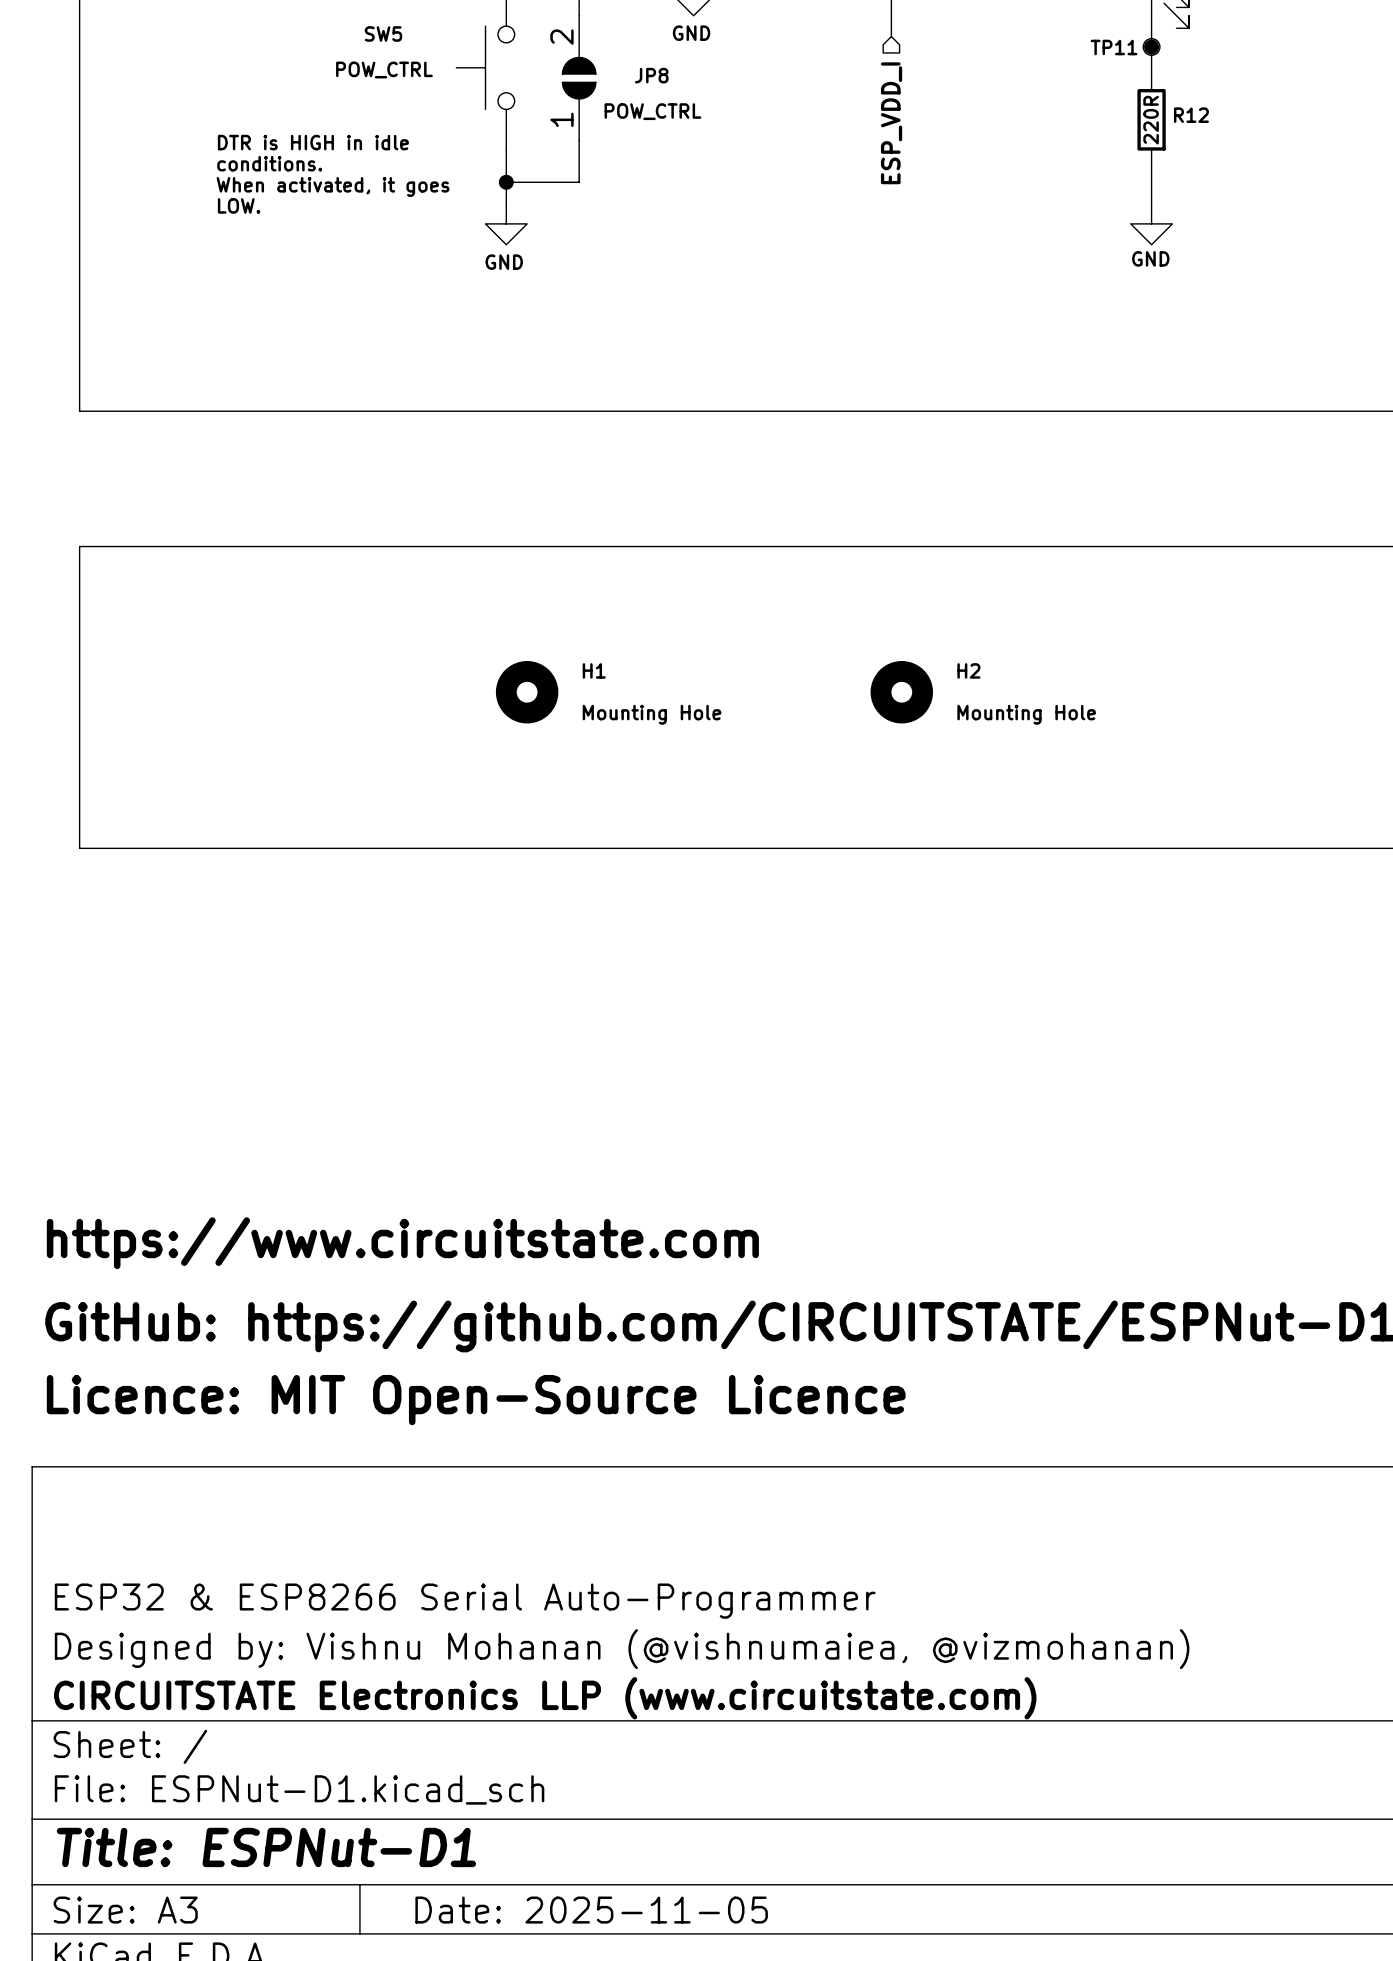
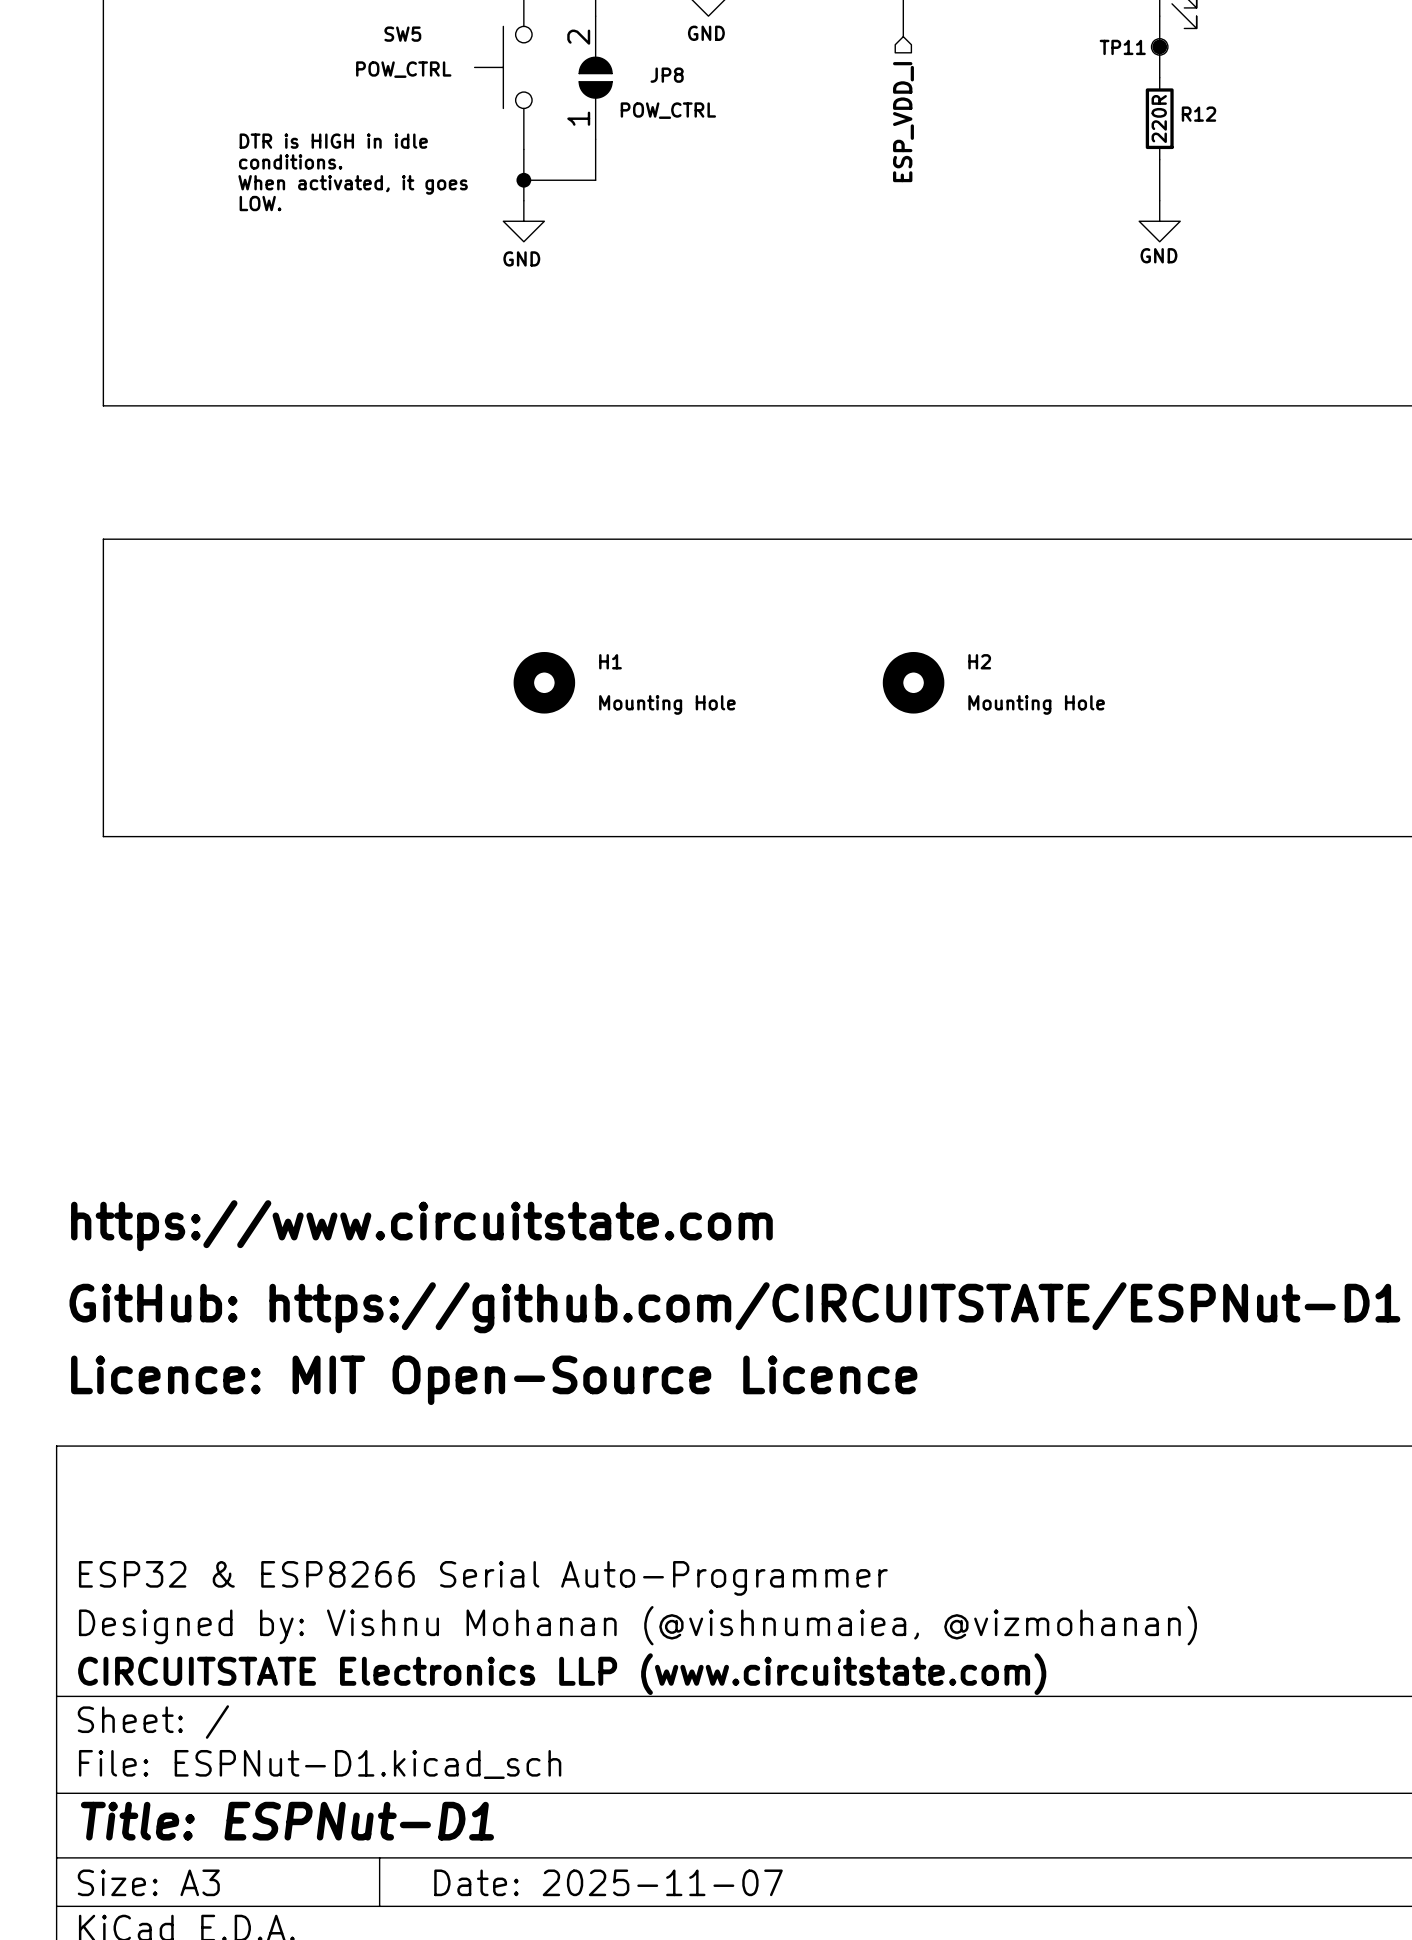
title block: Date: 2025-11-05 (591, 1910) -> Date: 2025-11-07 (608, 1882)

